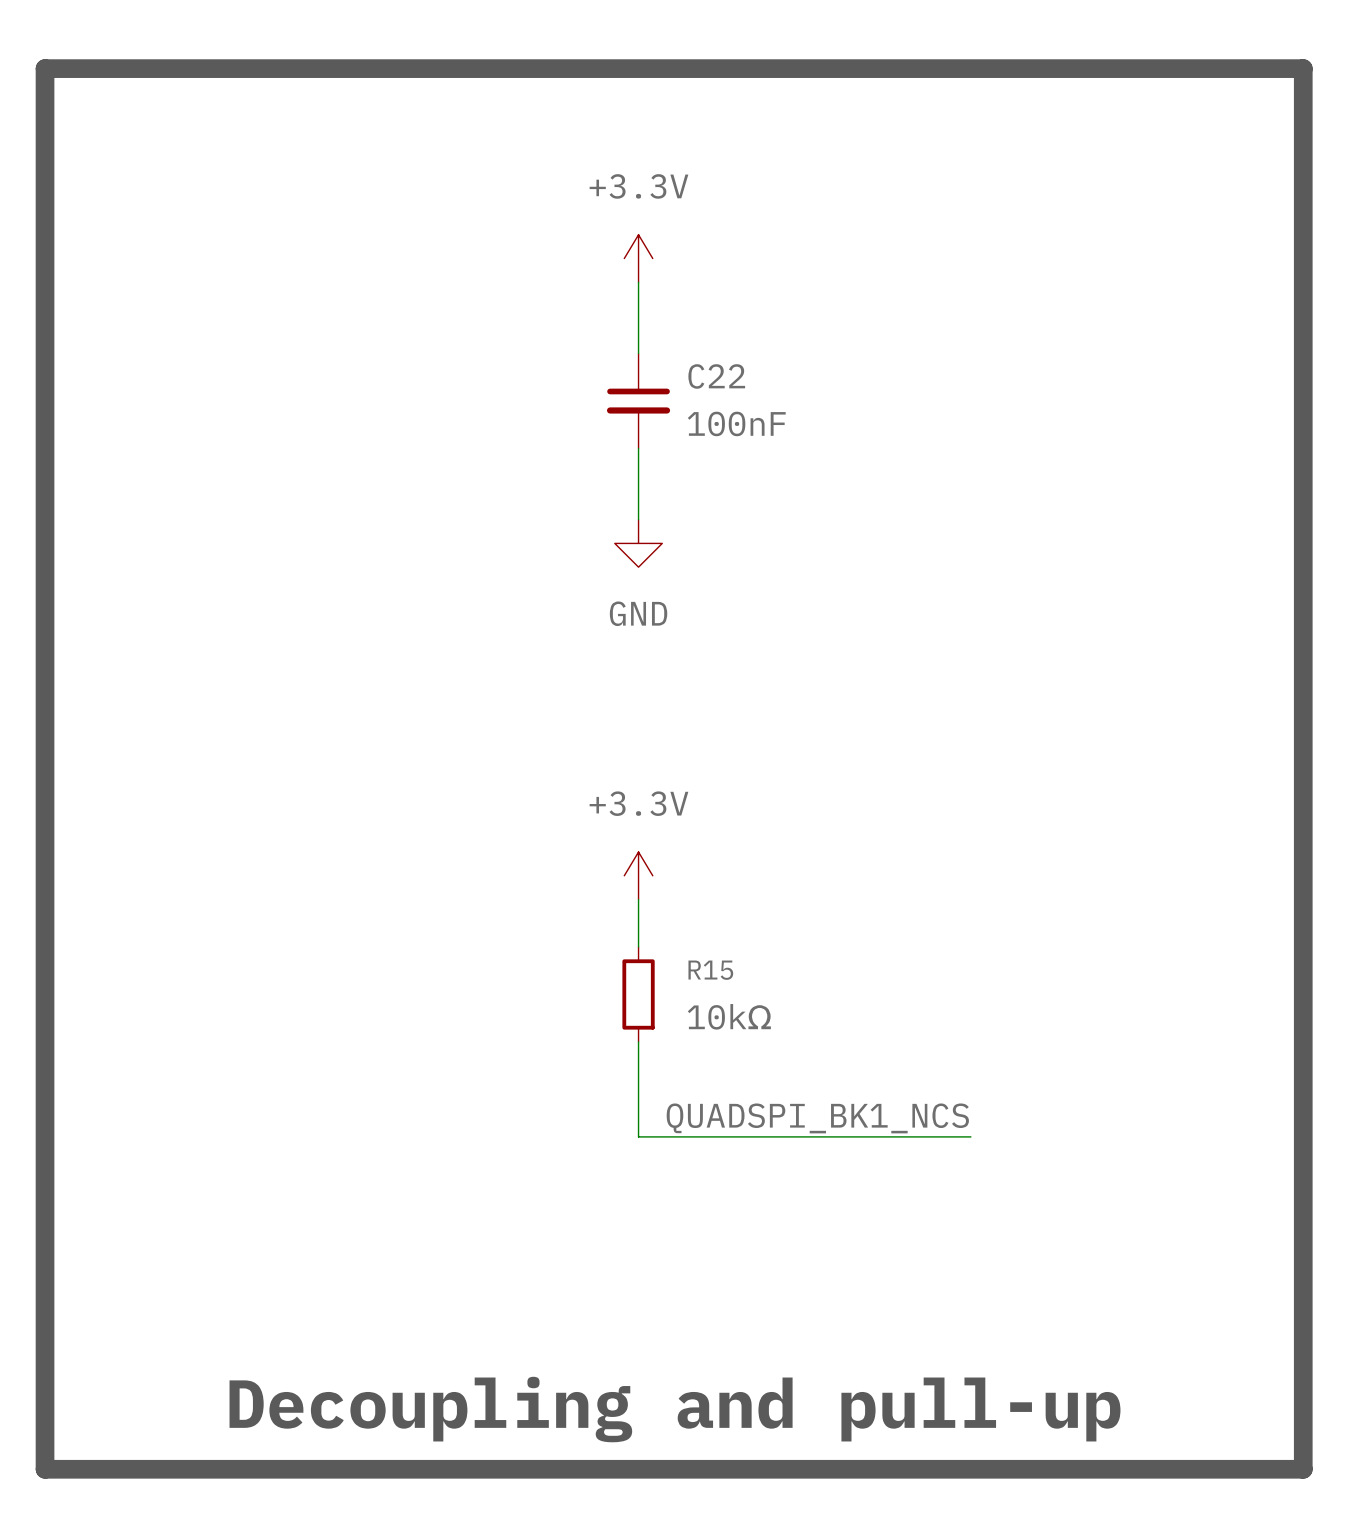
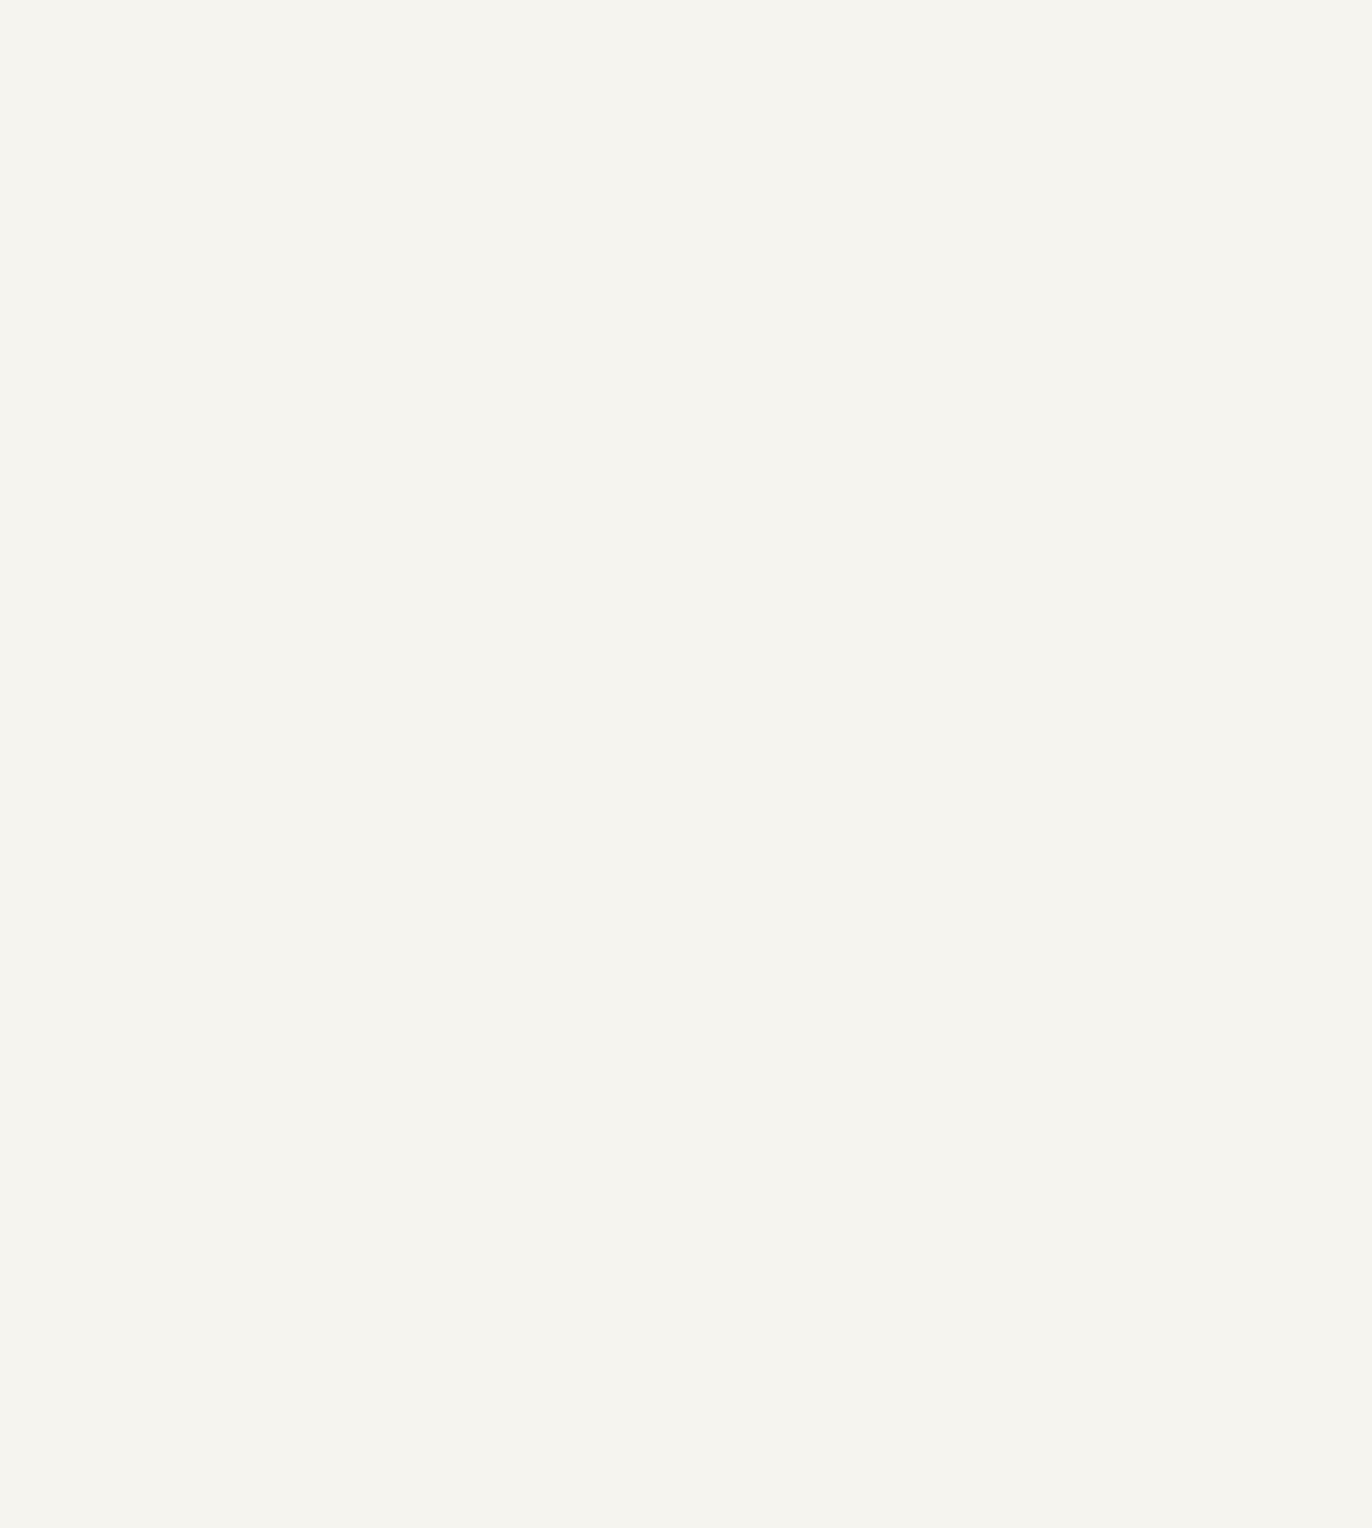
line: (45, 68) (1303, 68) (1303, 1469) (45, 1469) (45, 68) -> none
power symbol: +3.3V (638, 258) -> none
wire: (638, 282) (638, 353) -> none
C22: 100nF (638, 400) -> none
wire: (638, 448) (638, 519) -> none
power symbol: GND (638, 543) -> none
power symbol: +3.3V (638, 875) -> none
wire: (638, 899) (638, 947) -> none
R15: 10kΩ (638, 994) -> none
wire: (638, 1041) (638, 1136) (970, 1136) -> none
label: QUADSPI_BK1_NCS (817, 1118) -> none
text: Decoupling and pull-up (675, 1409) -> none

